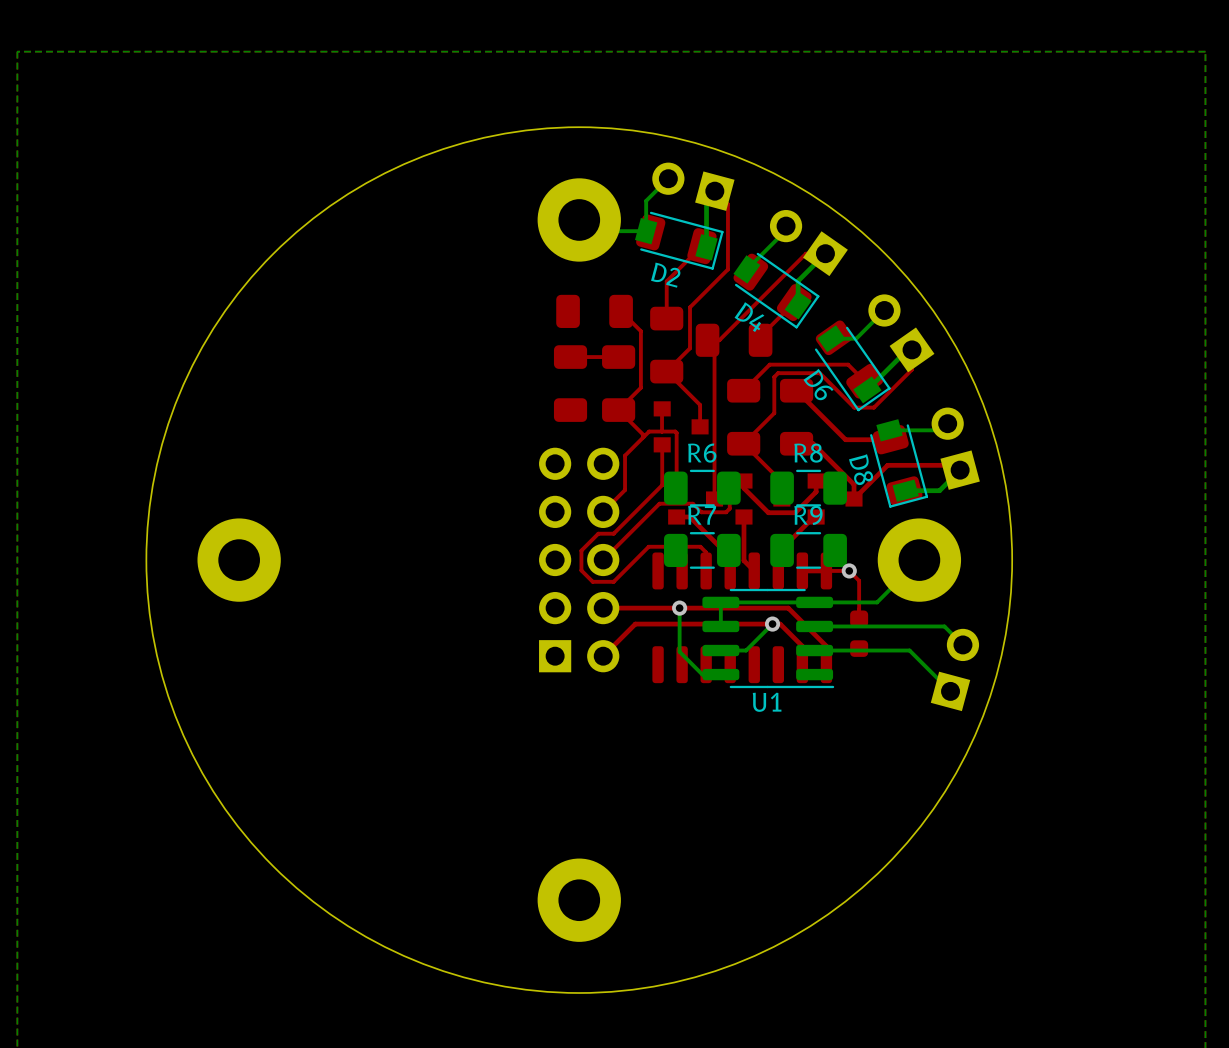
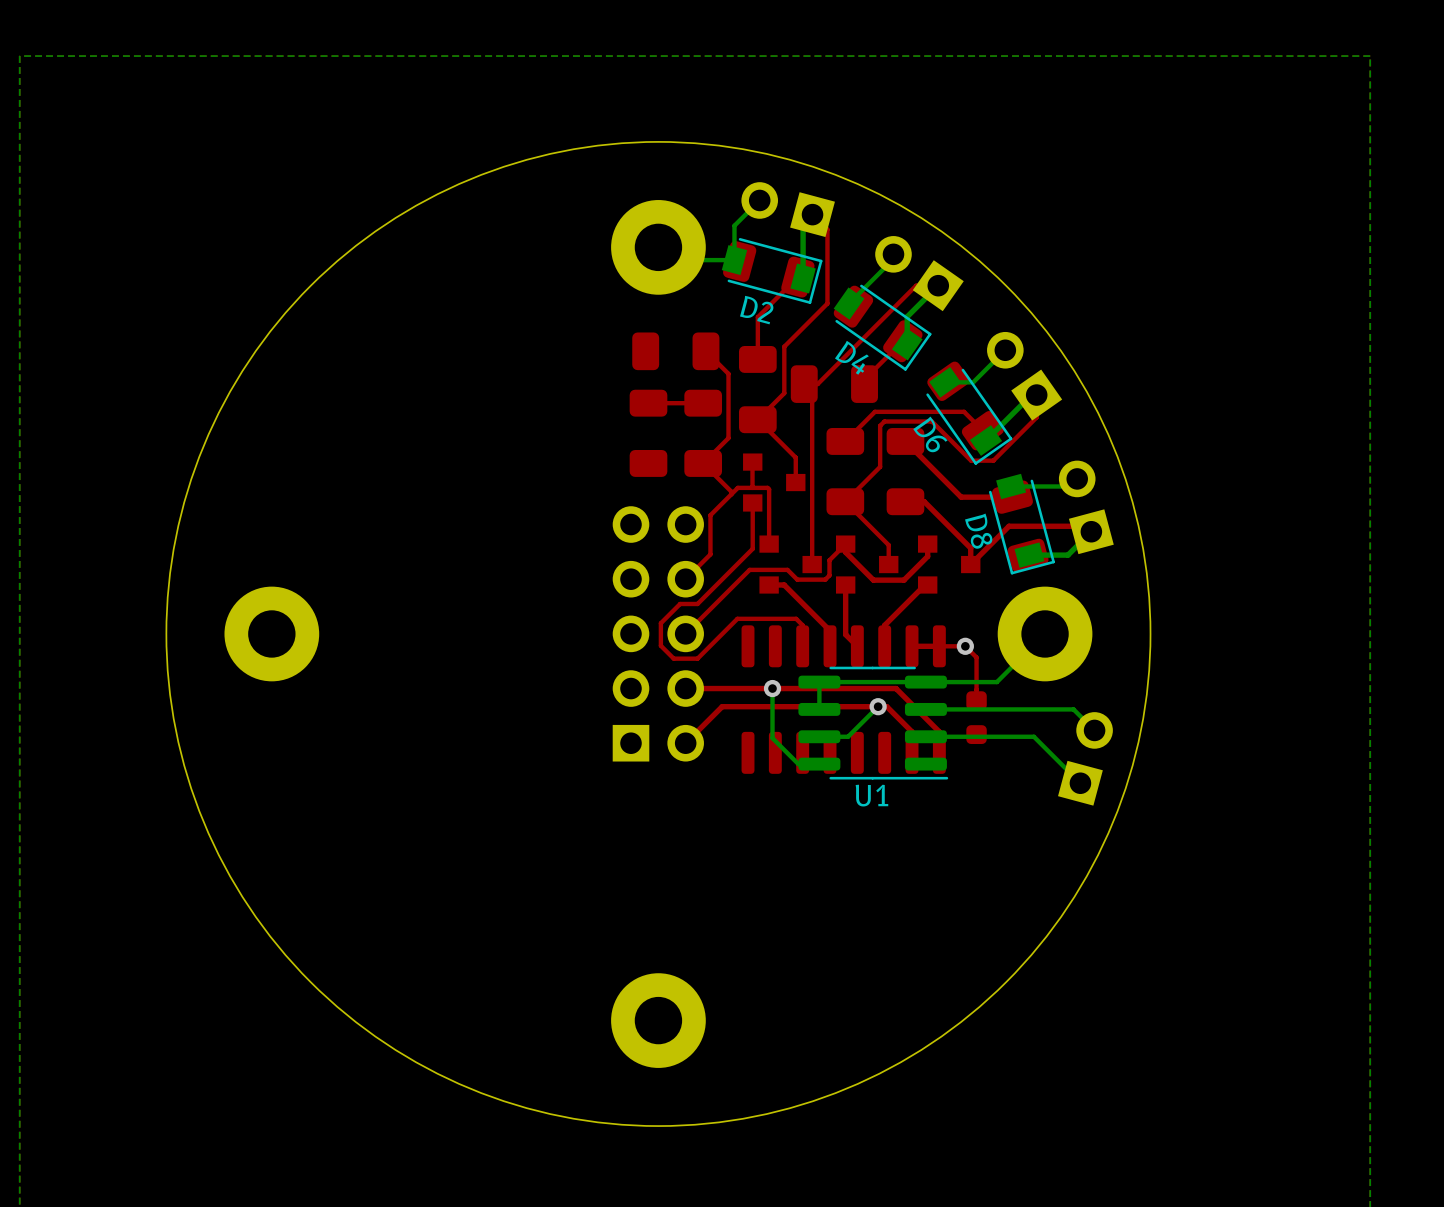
R6: (702, 488) -> none
R8: (808, 488) -> none
R7: (702, 550) -> none
R9: (808, 550) -> none

